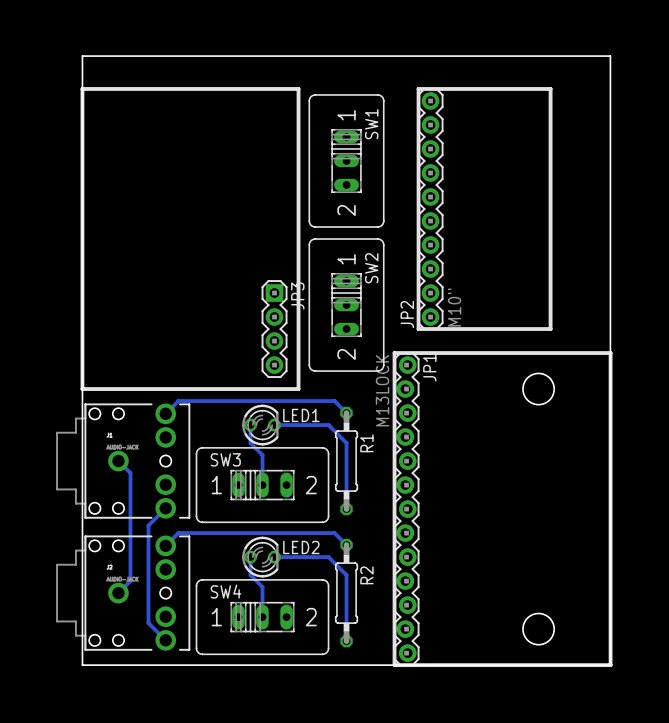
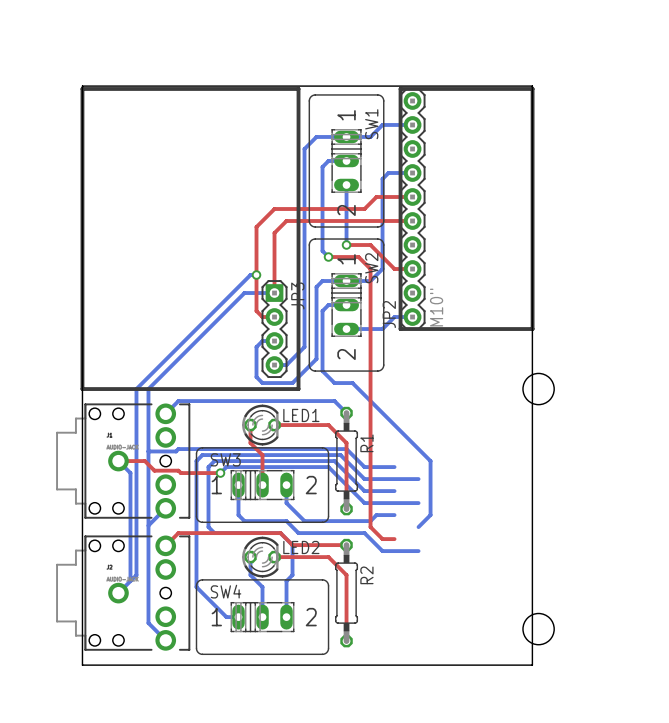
board edge: (82, 86) (82, 56) (610, 56) (610, 665) (532, 665) -> (82, 86) (532, 86) (532, 665)
line: (418, 88) (418, 329) -> (418, 88) (400, 88) (400, 329) (418, 329)
line: (532, 88) (550, 88) (550, 329) (532, 329) -> (532, 88) (532, 329)
bottom track: none -> (412, 124) (382, 124) (370, 136) (316, 136) (304, 148) (304, 347) (286, 365) (274, 365)
bottom track: none -> (346, 160) (328, 160) (322, 166) (322, 251) (328, 257)
bottom track: none -> (412, 172) (388, 172) (382, 178) (382, 269) (370, 281) (322, 281) (316, 287) (316, 359) (292, 383) (262, 383) (256, 377) (256, 347) (262, 341) (274, 341)
bottom track: none -> (346, 184) (346, 245)
top track: none -> (412, 197) (376, 197) (364, 209) (274, 209) (256, 227) (256, 311) (262, 317) (274, 317)
JP2 position: (430, 209) -> (412, 209)
top track: none -> (412, 221) (286, 221) (274, 233) (274, 293)
top track: none -> (346, 245) (370, 245) (394, 269) (412, 269)
via: none -> (346, 245)
top track: none -> (328, 257) (358, 257) (370, 269) (370, 527) (382, 539) (394, 539)
via: none -> (328, 257)
bottom track: none -> (256, 275) (250, 275) (136, 389) (136, 575) (130, 581)
via: none -> (256, 275)
bottom track: none -> (274, 293) (244, 293) (148, 389) (148, 525)
bottom track: none -> (346, 305) (328, 305) (322, 311) (322, 371) (334, 383) (352, 383) (430, 461) (430, 515) (418, 527)
bottom track: none -> (412, 317) (394, 317) (382, 329) (346, 329)
line: (394, 353) (394, 665) (610, 665) (610, 353) (394, 353) -> none
bottom track: (250, 425) (250, 443) (262, 455) (262, 485) -> none
top track: none -> (250, 425) (250, 443) (262, 455) (262, 485)
bottom track: (274, 425) (328, 425) (346, 443) (346, 509) -> none
top track: none -> (274, 425) (328, 425) (346, 443) (346, 509)
bottom track: none -> (148, 451) (176, 451) (178, 449) (346, 449) (364, 467) (394, 467)
top track: none -> (118, 461) (144, 461) (154, 470) (220, 473)
bottom track: none -> (220, 473) (226, 467) (328, 467) (364, 503) (418, 503)
via: none -> (220, 473)
bottom track: none -> (418, 479) (364, 479) (340, 455) (202, 455) (196, 461) (196, 587) (226, 617) (238, 617)
bottom track: none -> (286, 485) (286, 503) (304, 521) (370, 521) (376, 515) (394, 515)
JP1: M13LOCK (406, 509) -> none
bottom track: (214, 533) (178, 533) (165, 545) -> (214, 533) (208, 527) (208, 467) (214, 461) (334, 461) (364, 491) (394, 491)
bottom track: (280, 533) (298, 533) -> (238, 485) (238, 515) (244, 521) (286, 521) (298, 533)
bottom track: none -> (280, 533) (292, 545) (292, 575) (286, 581) (286, 617)
bottom track: (334, 533) (346, 545) -> (334, 533) (364, 533) (382, 551) (418, 551)
top track: none -> (346, 545) (292, 545) (280, 533) (178, 533) (165, 545)
bottom track: (274, 557) (328, 557) (346, 575) (346, 641) -> none
top track: none -> (274, 557) (328, 557) (346, 575) (346, 641)

